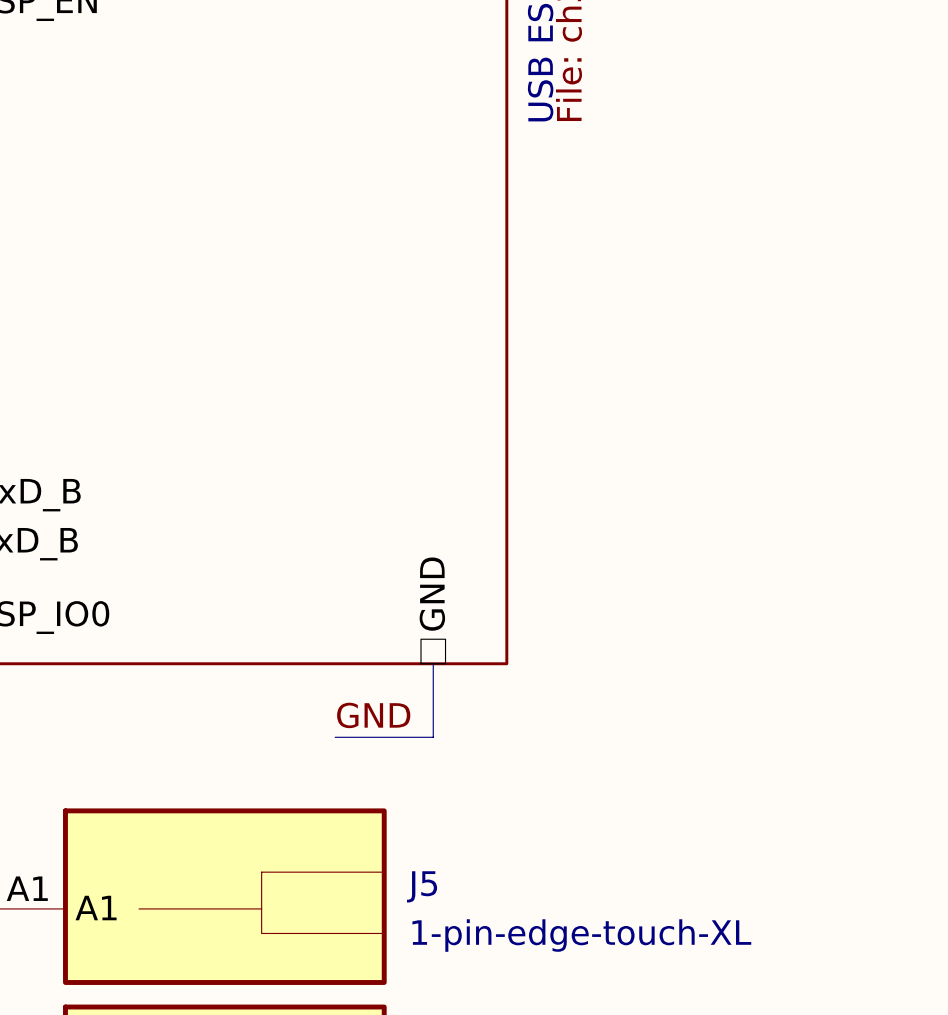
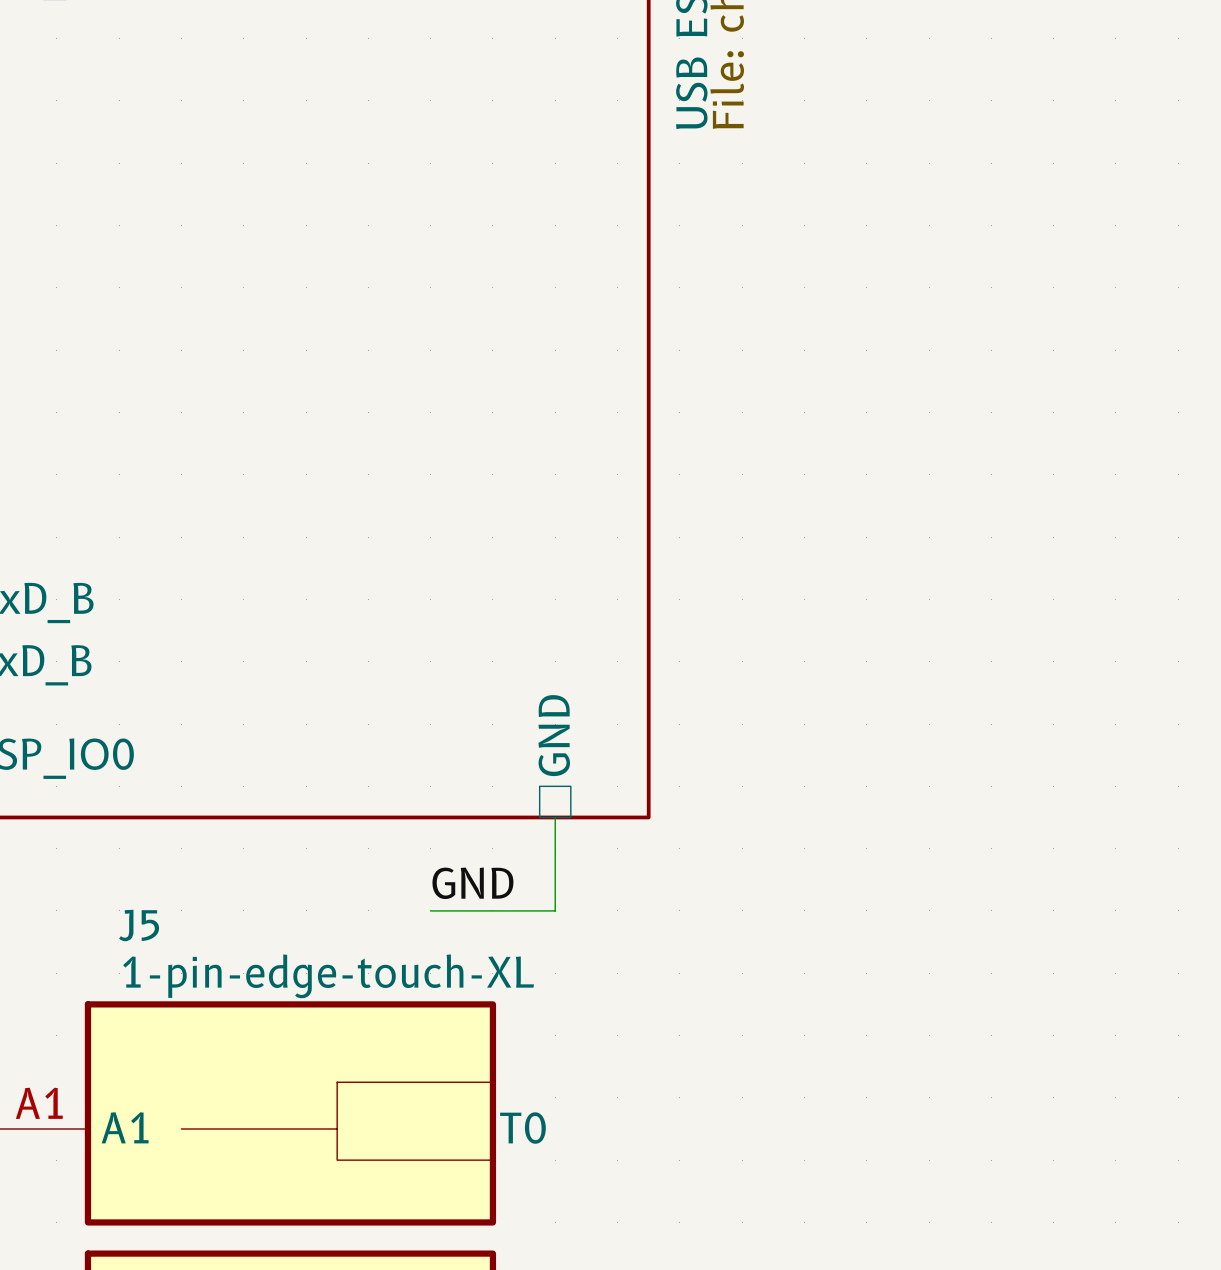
J5 name position: J5 (422, 886) -> J5 (139, 925)
J5 text: none -> T0 (522, 1128)
J5 value position: 1-pin-edge-touch-XL (581, 935) -> 1-pin-edge-touch-XL (328, 976)

